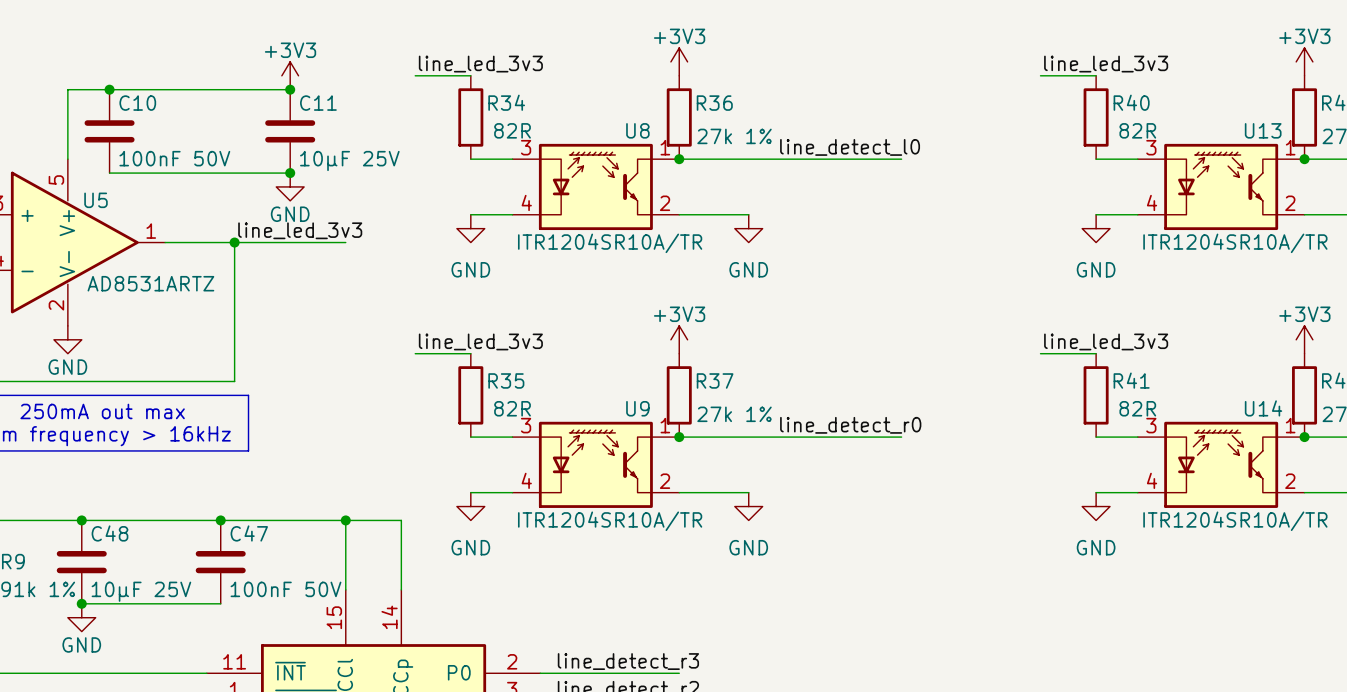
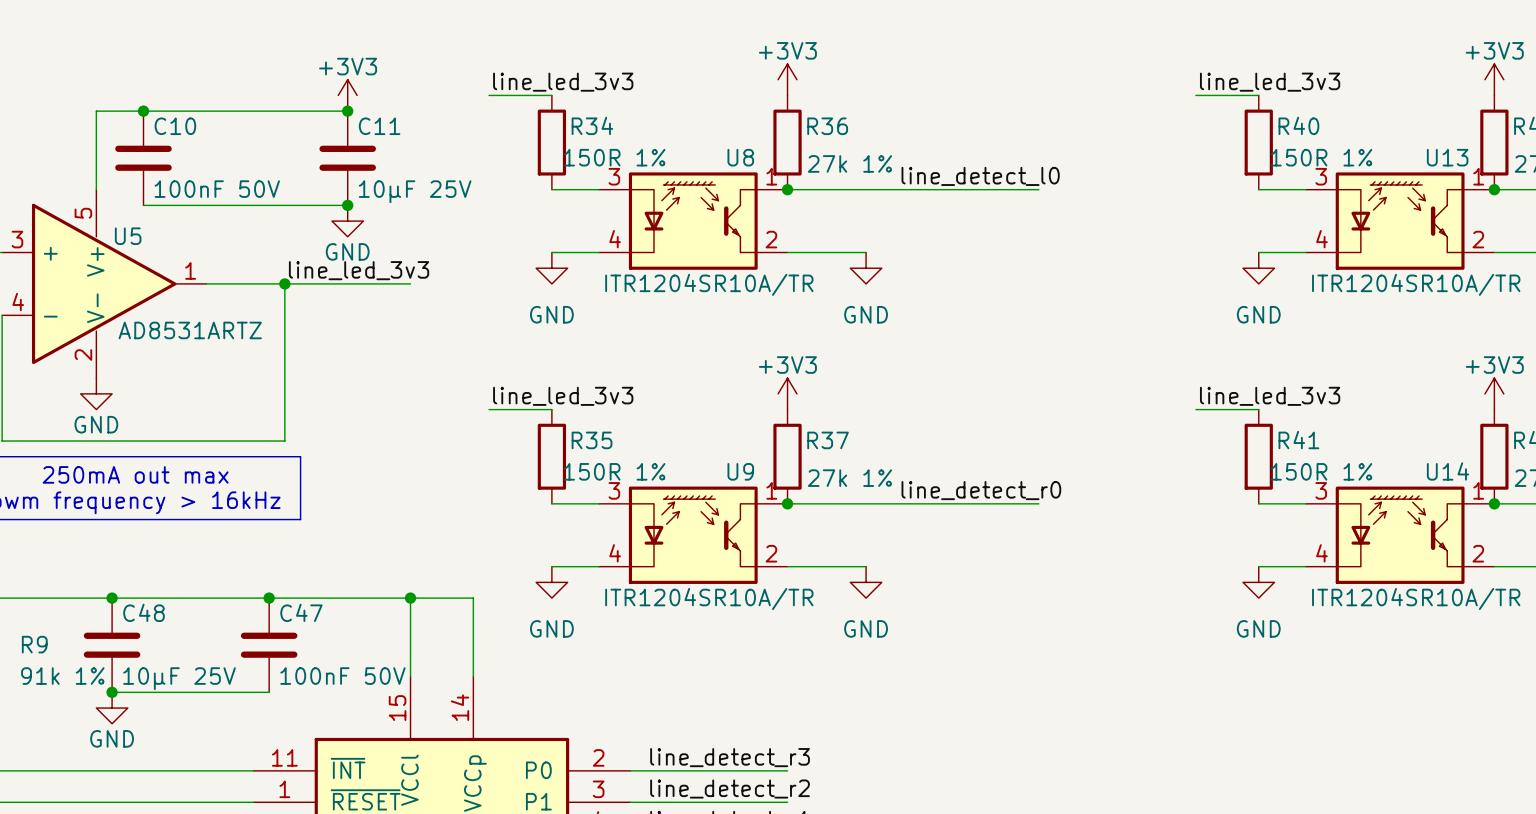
R34 value: 82R (512, 130) -> 150R 1% (614, 157)
R40 value: 82R (1137, 130) -> 150R 1% (1321, 157)
R35 value: 82R (512, 408) -> 150R 1% (614, 471)
R41 value: 82R (1137, 408) -> 150R 1% (1321, 471)

